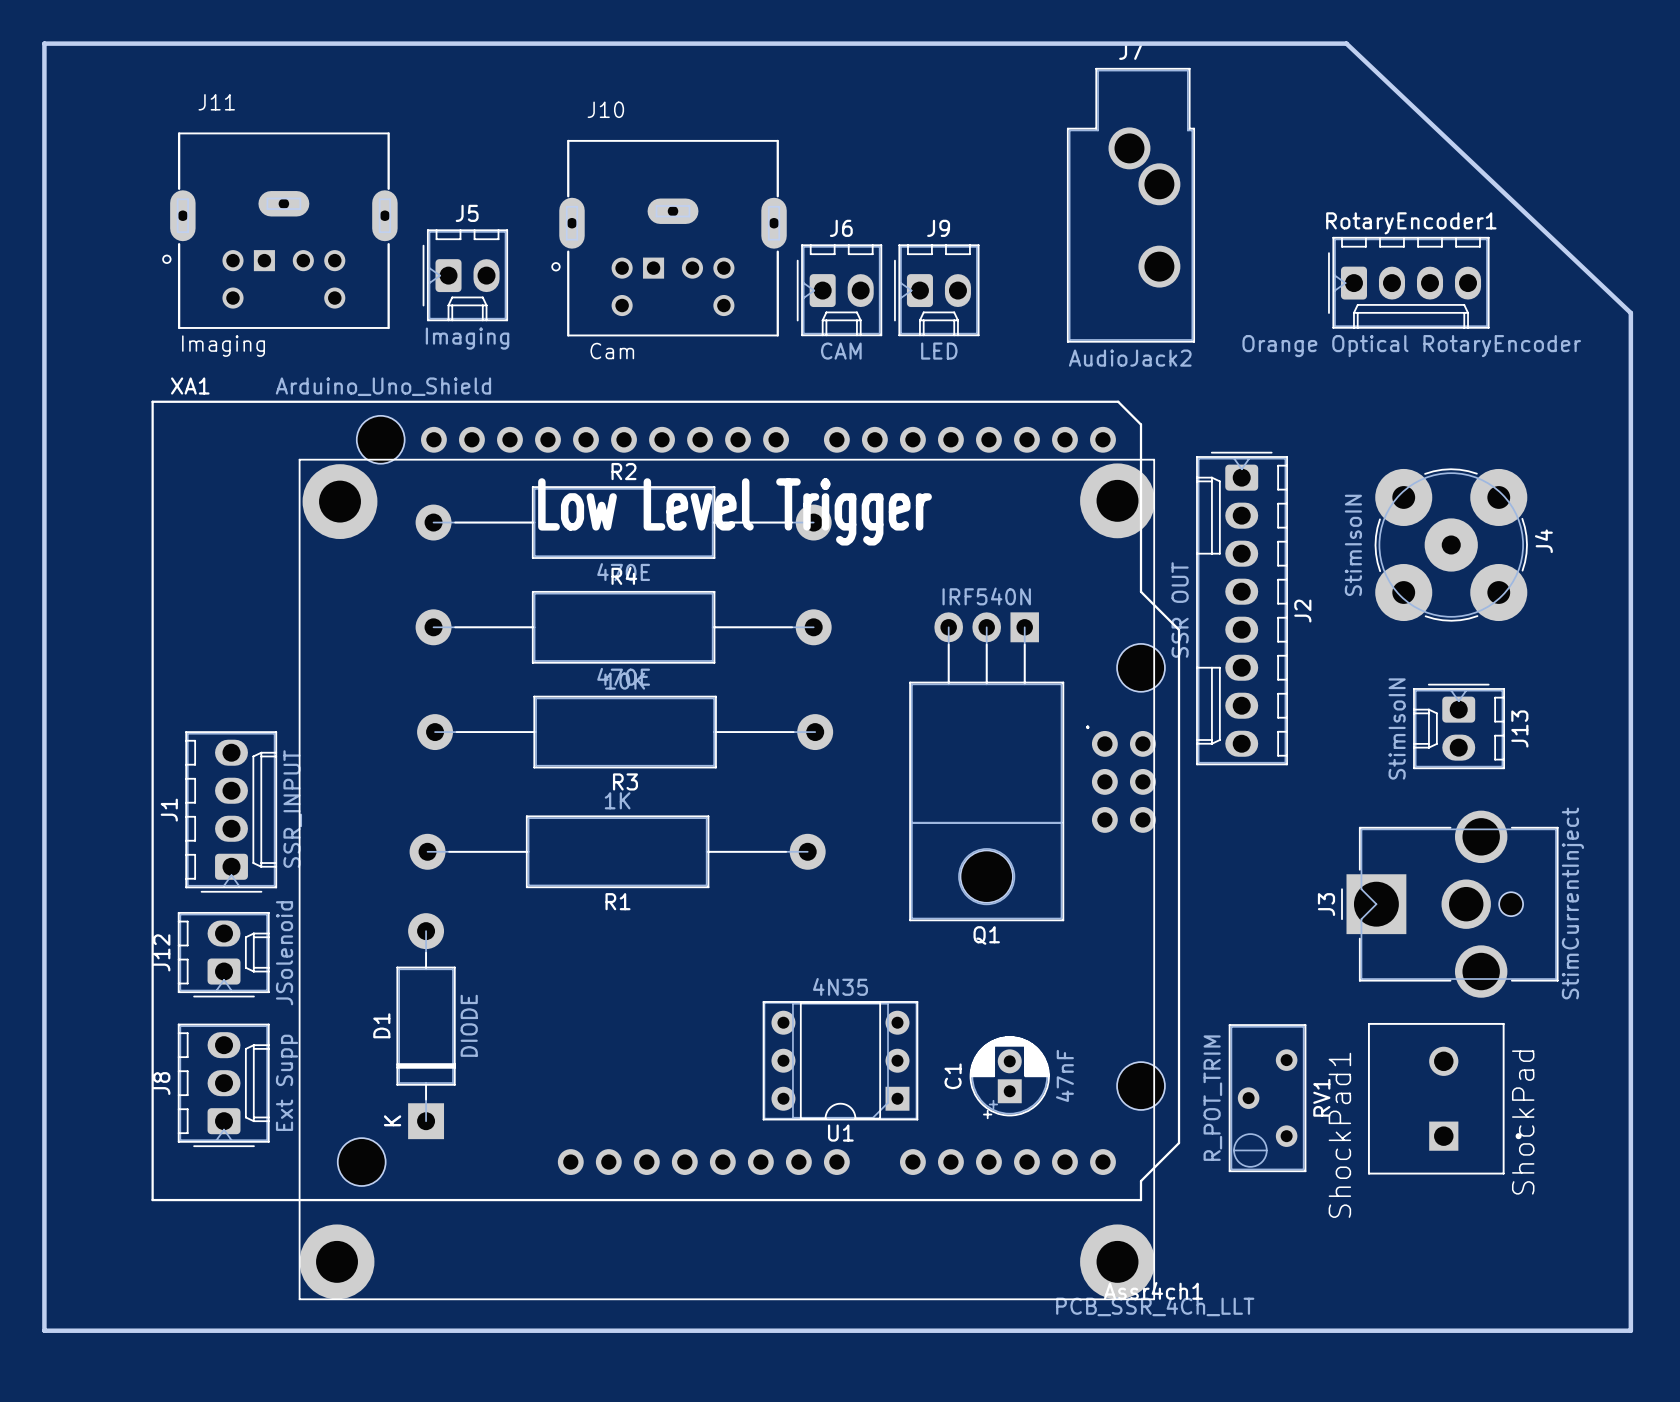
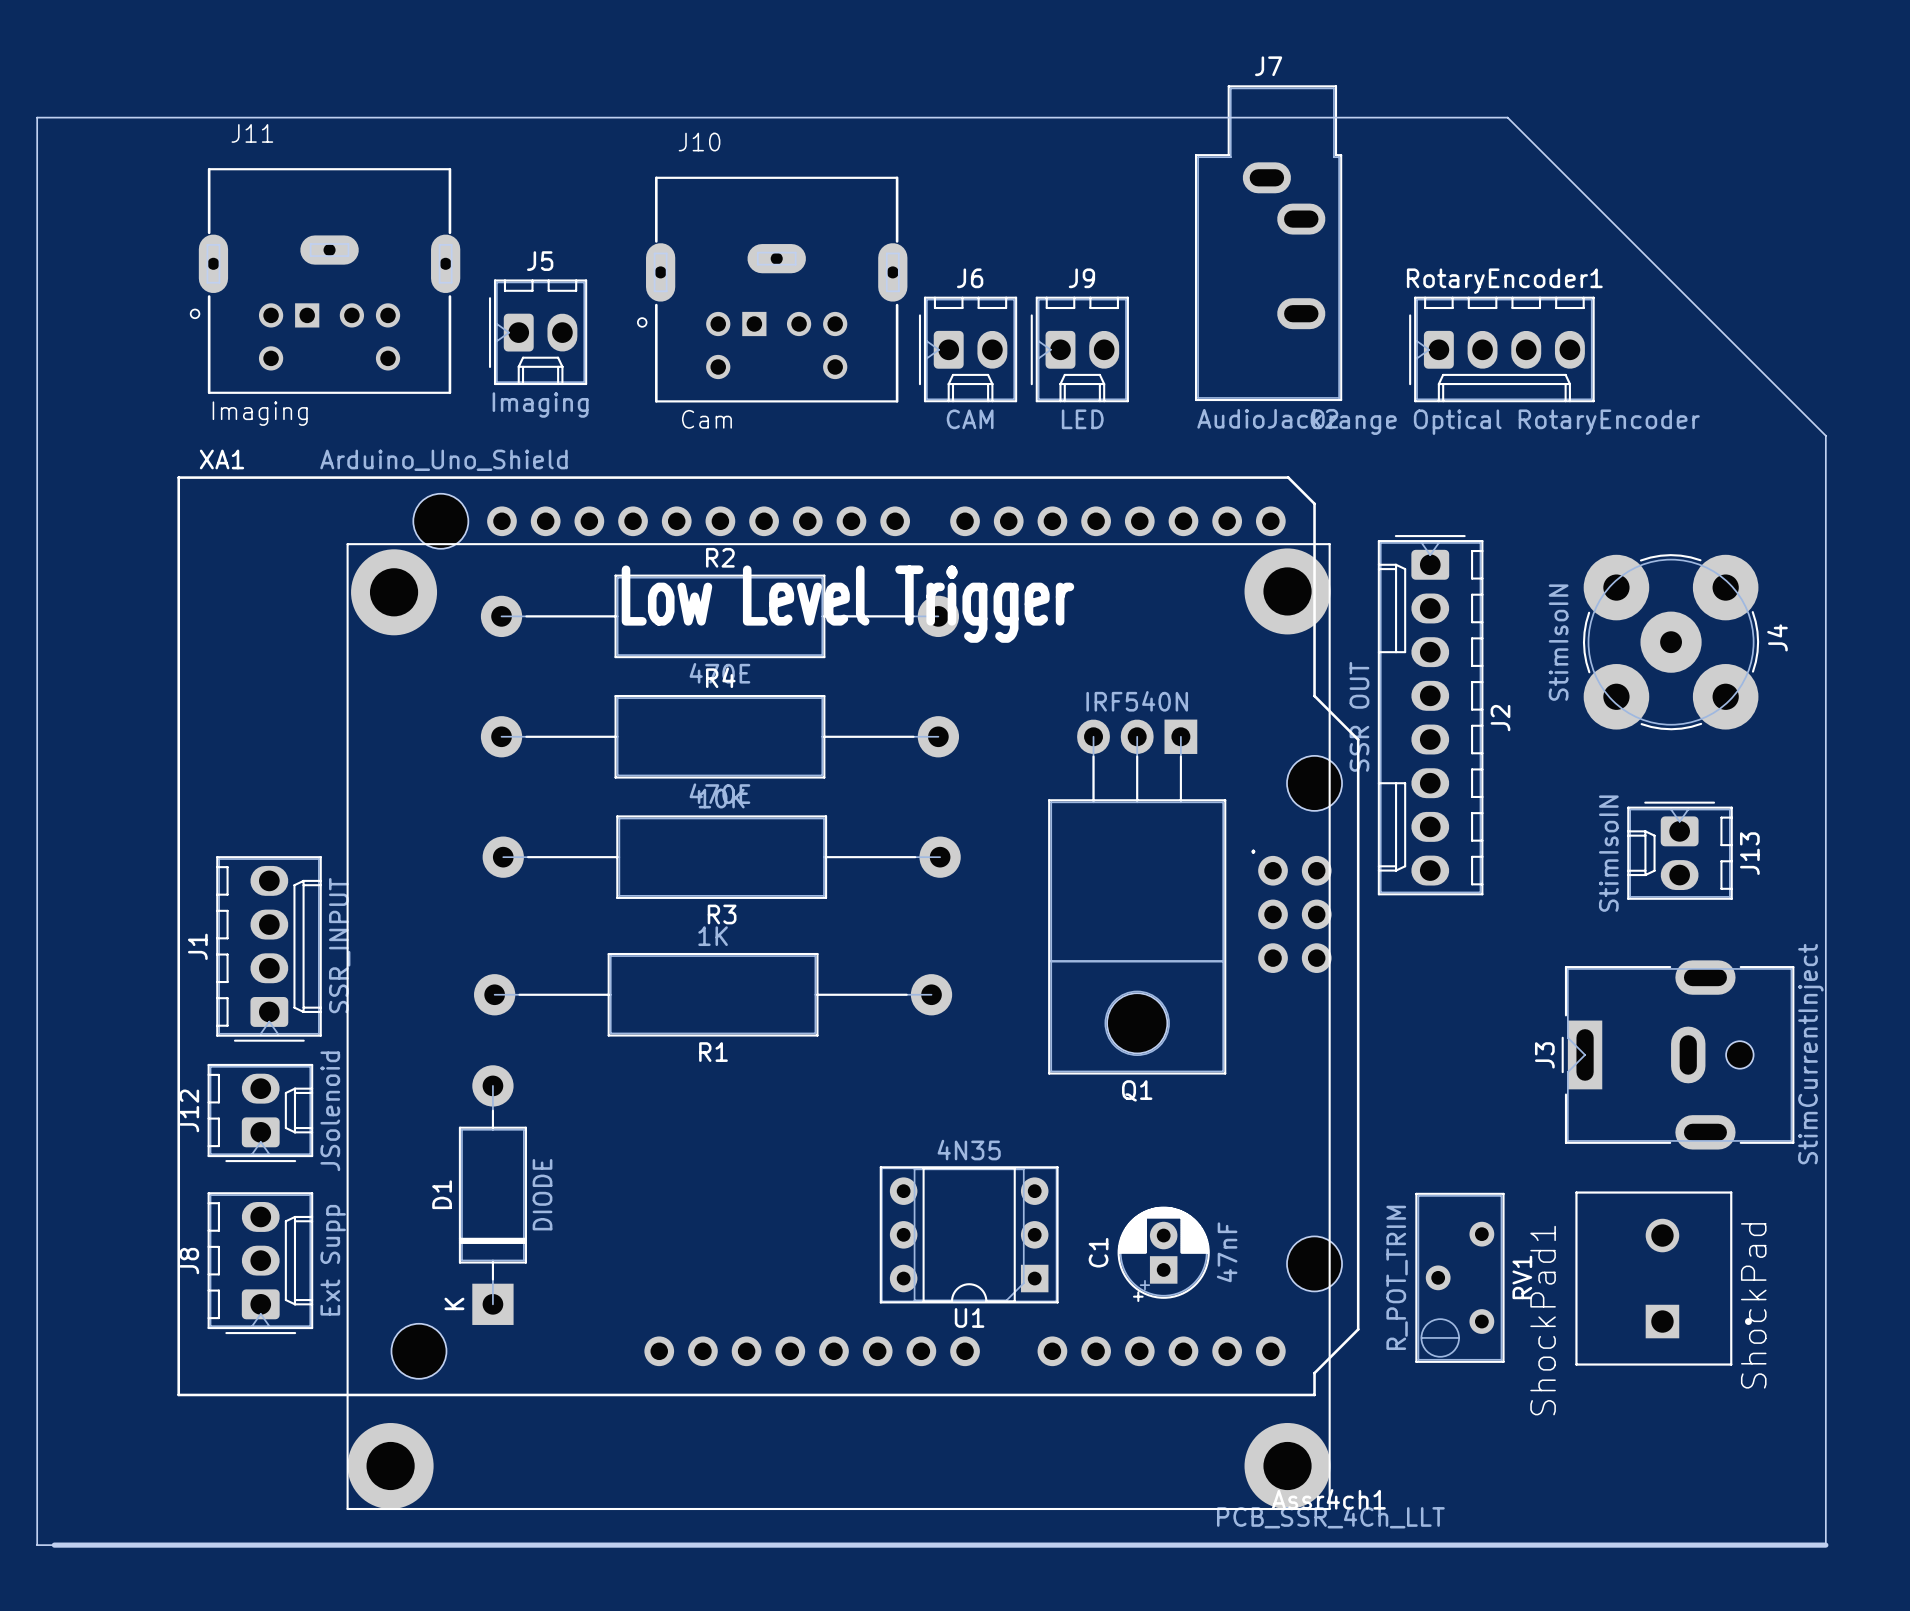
J7 footprint: [1066, 67, 1196, 343] -> [1194, 85, 1343, 402]
RotaryEncoder1 position: (1408, 282) -> (1501, 349)
J3 footprint: [1341, 810, 1559, 998] -> [1561, 960, 1795, 1150]
board edge: (44, 1330) (44, 43) (1346, 43) (1630, 313) (1630, 1330) (1585, 1330) -> (54, 1545) (37, 1545) (37, 117) (1507, 117) (1825, 435) (1825, 1545)

